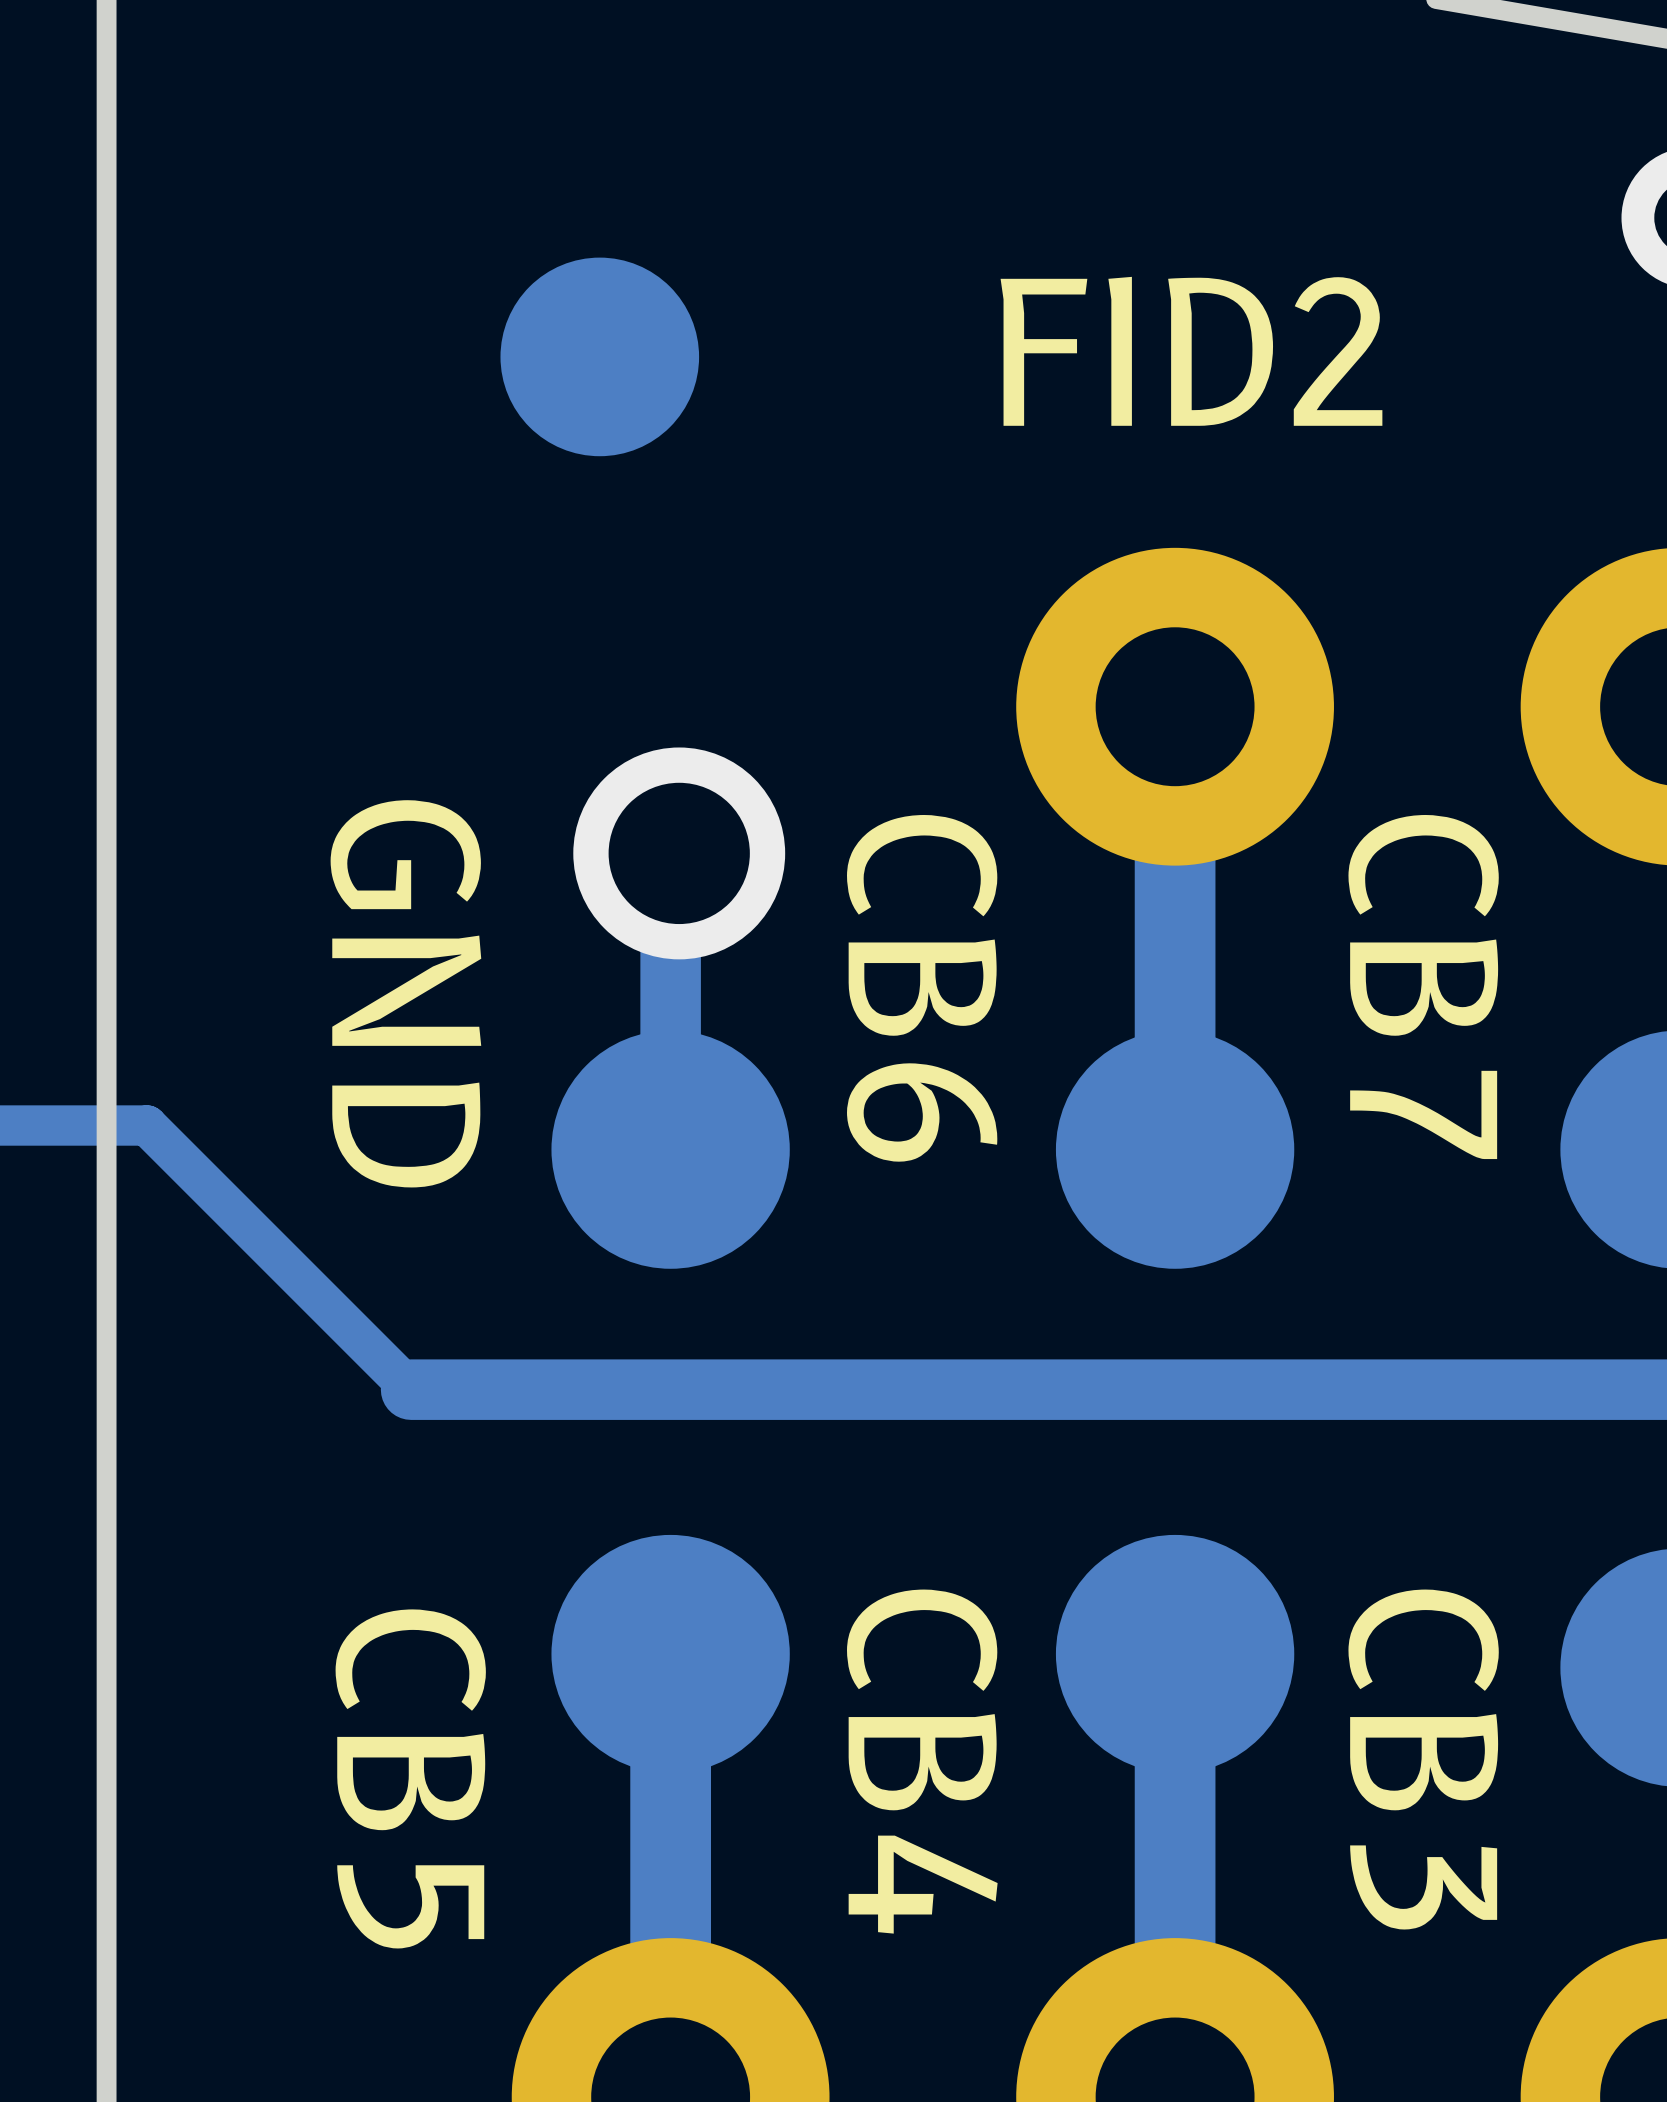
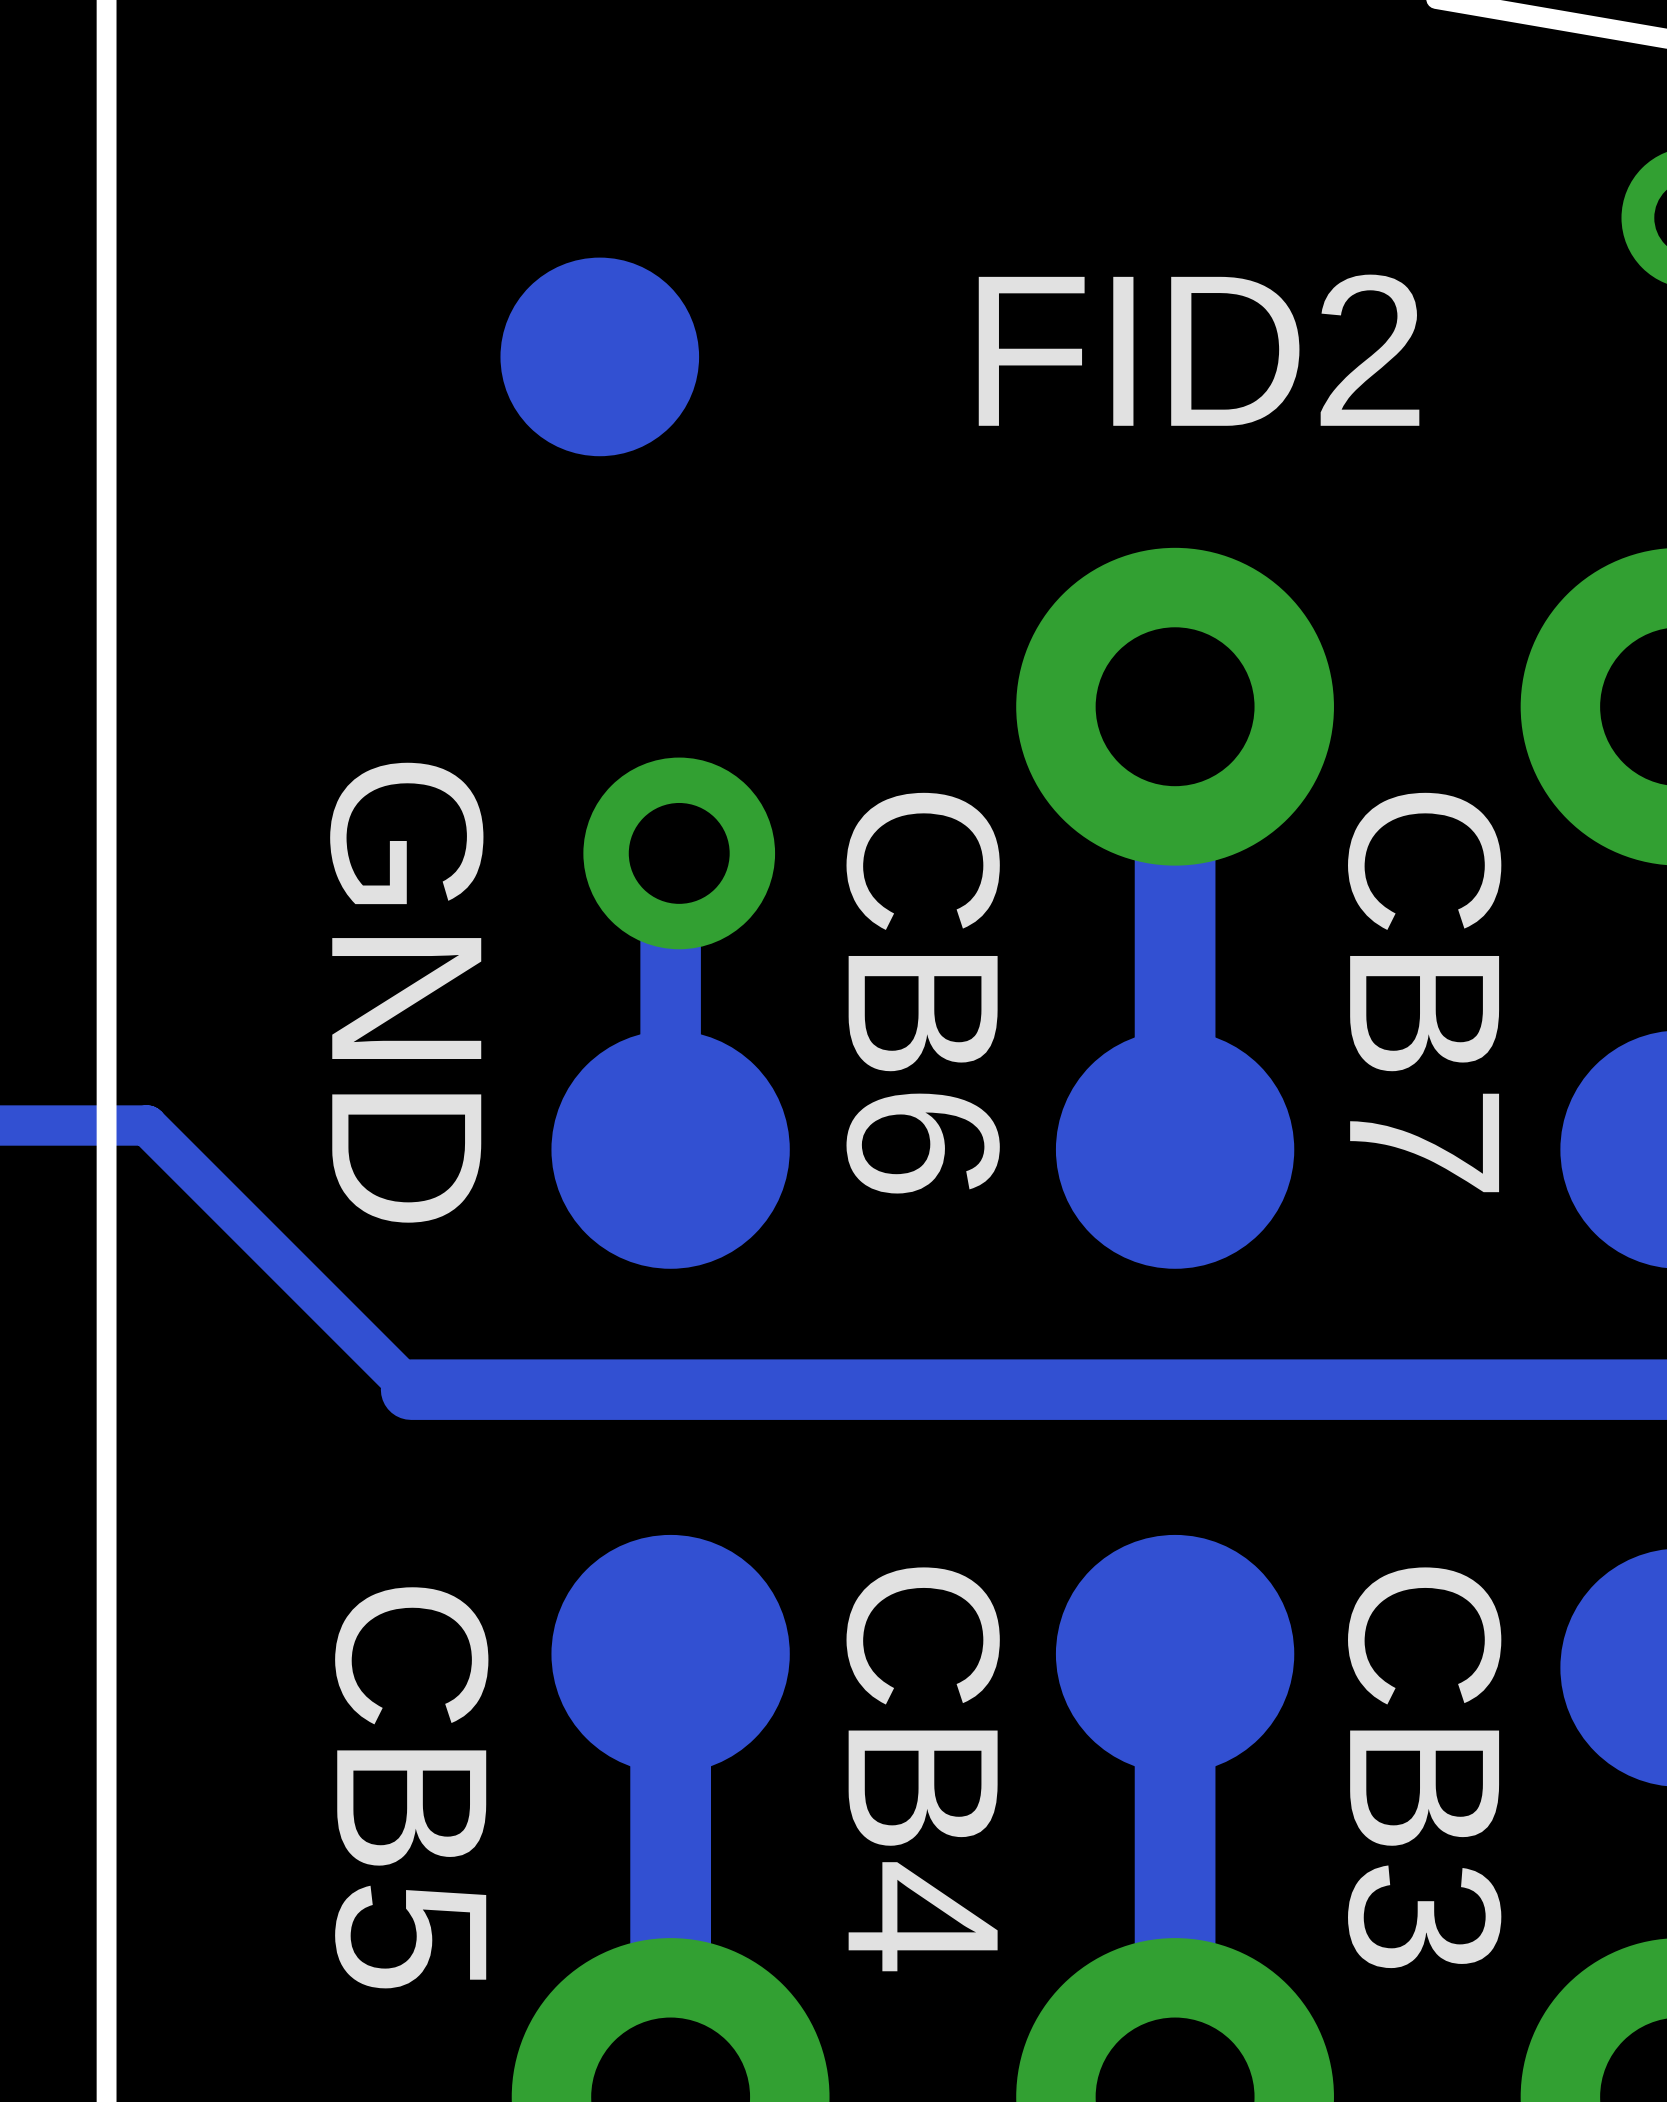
via size: [573, 747, 786, 960] -> [583, 757, 776, 950]

